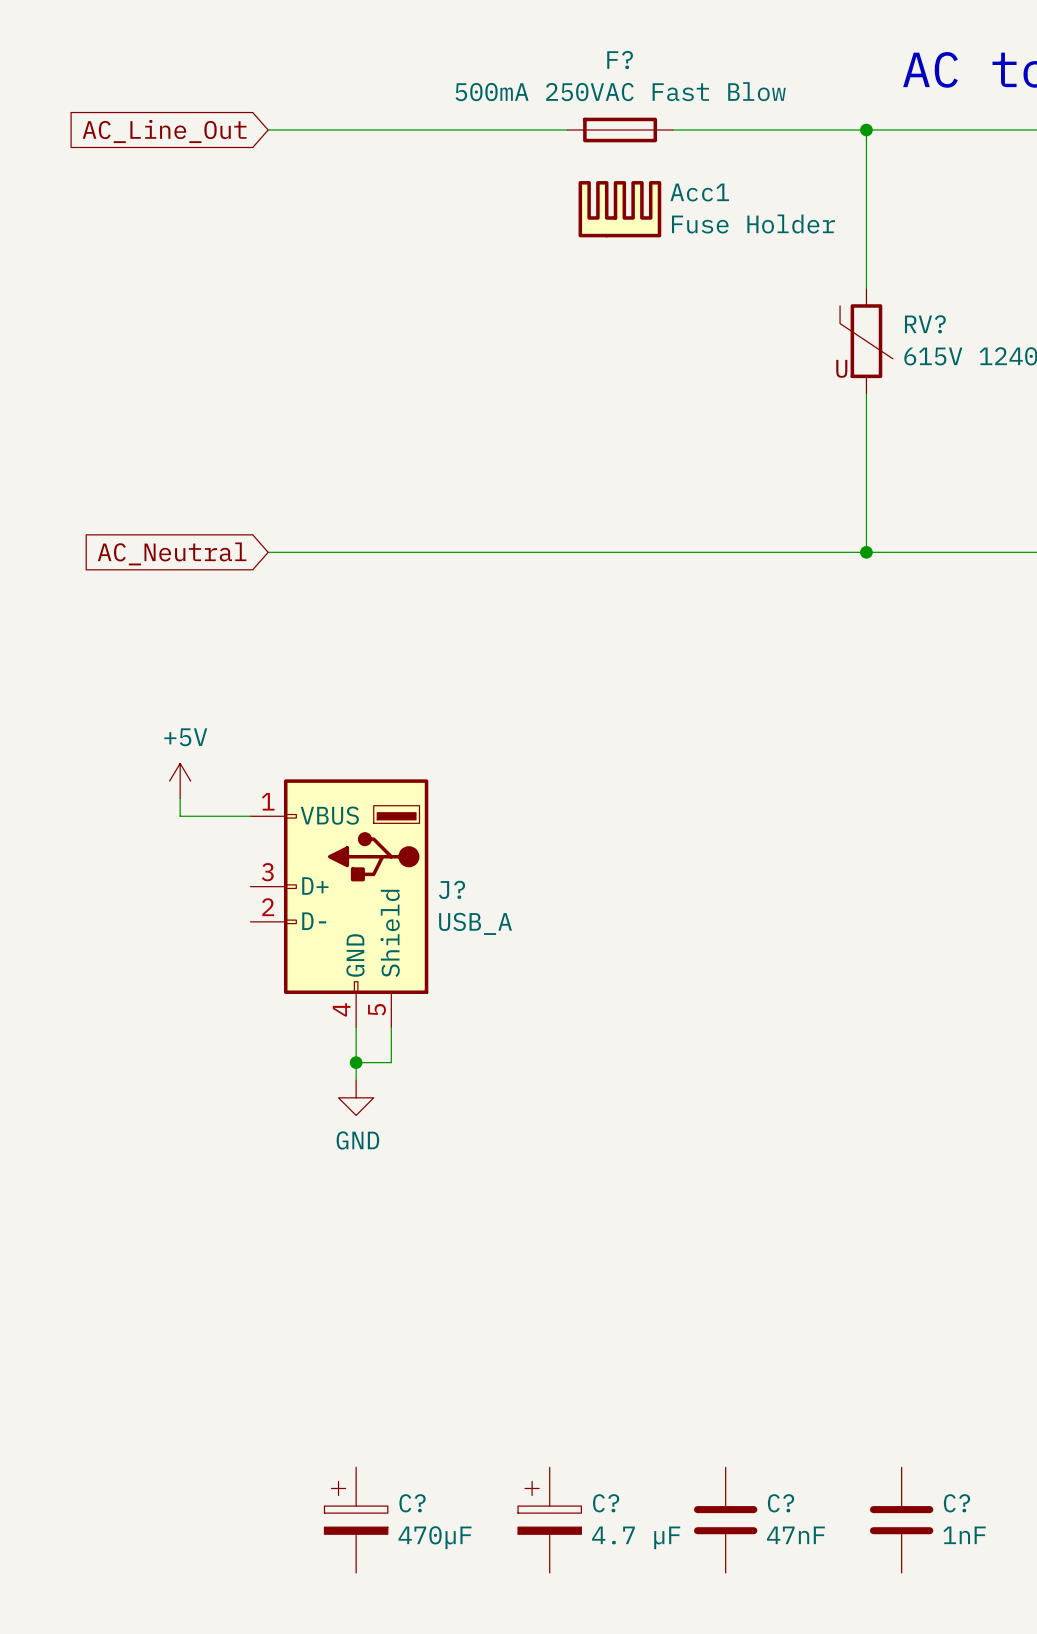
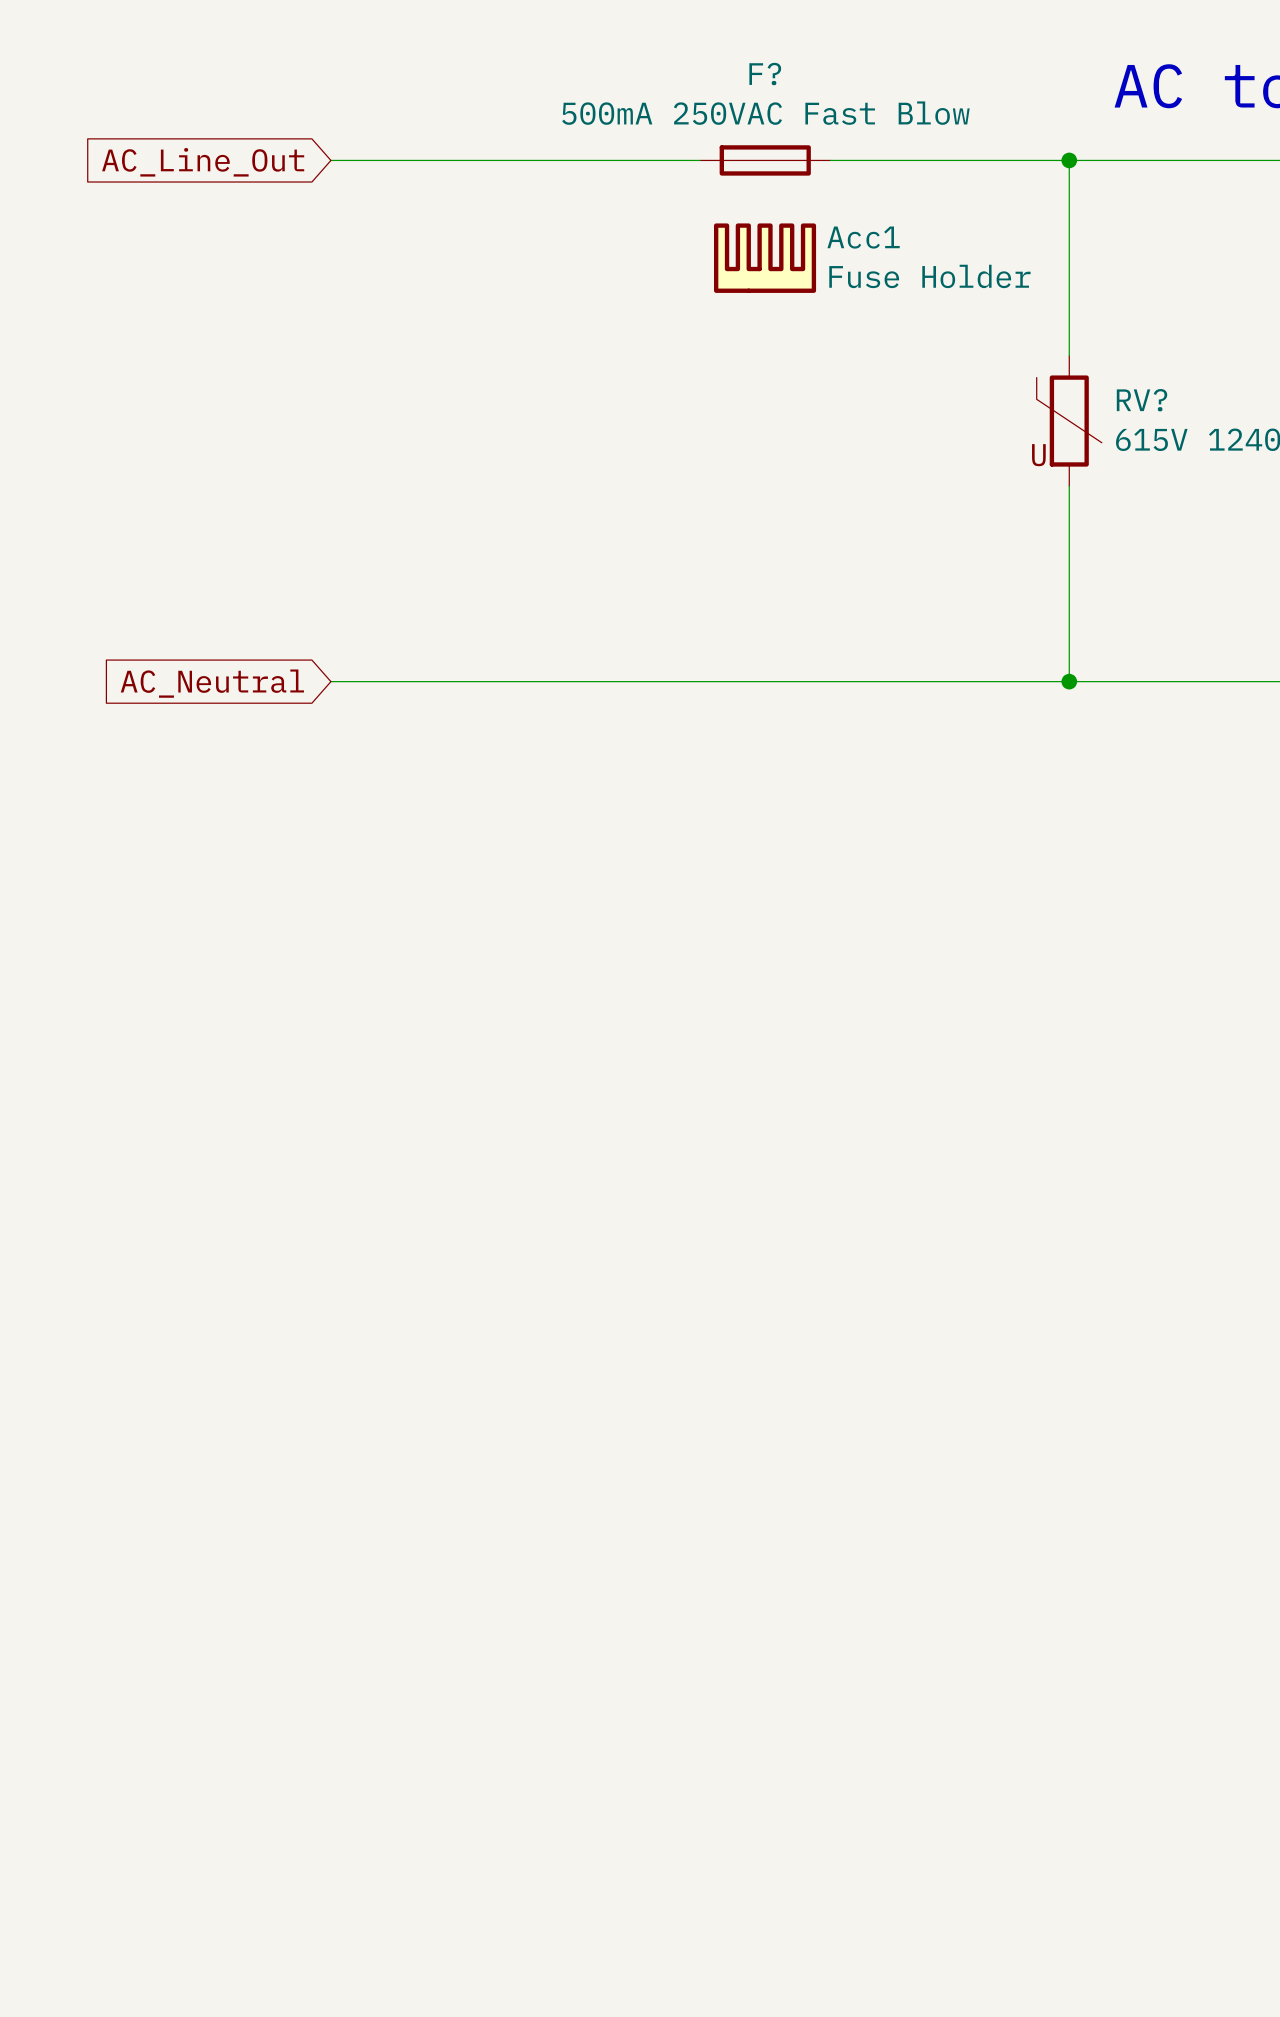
power symbol: +5V (180, 781) -> none
wire: (180, 798) (180, 816) (250, 816) -> none
J?: USB_A (339, 903) -> none
wire: (356, 1027) (356, 1080) -> none
wire: (391, 1027) (391, 1062) (356, 1062) -> none
junction: (356, 1062) -> none
power symbol: GND (356, 1097) -> none
C?: 470µF (356, 1520) -> none
C?: 4.7 µF (549, 1520) -> none
C?: 47nF (725, 1520) -> none
C?: 1nF (901, 1520) -> none

